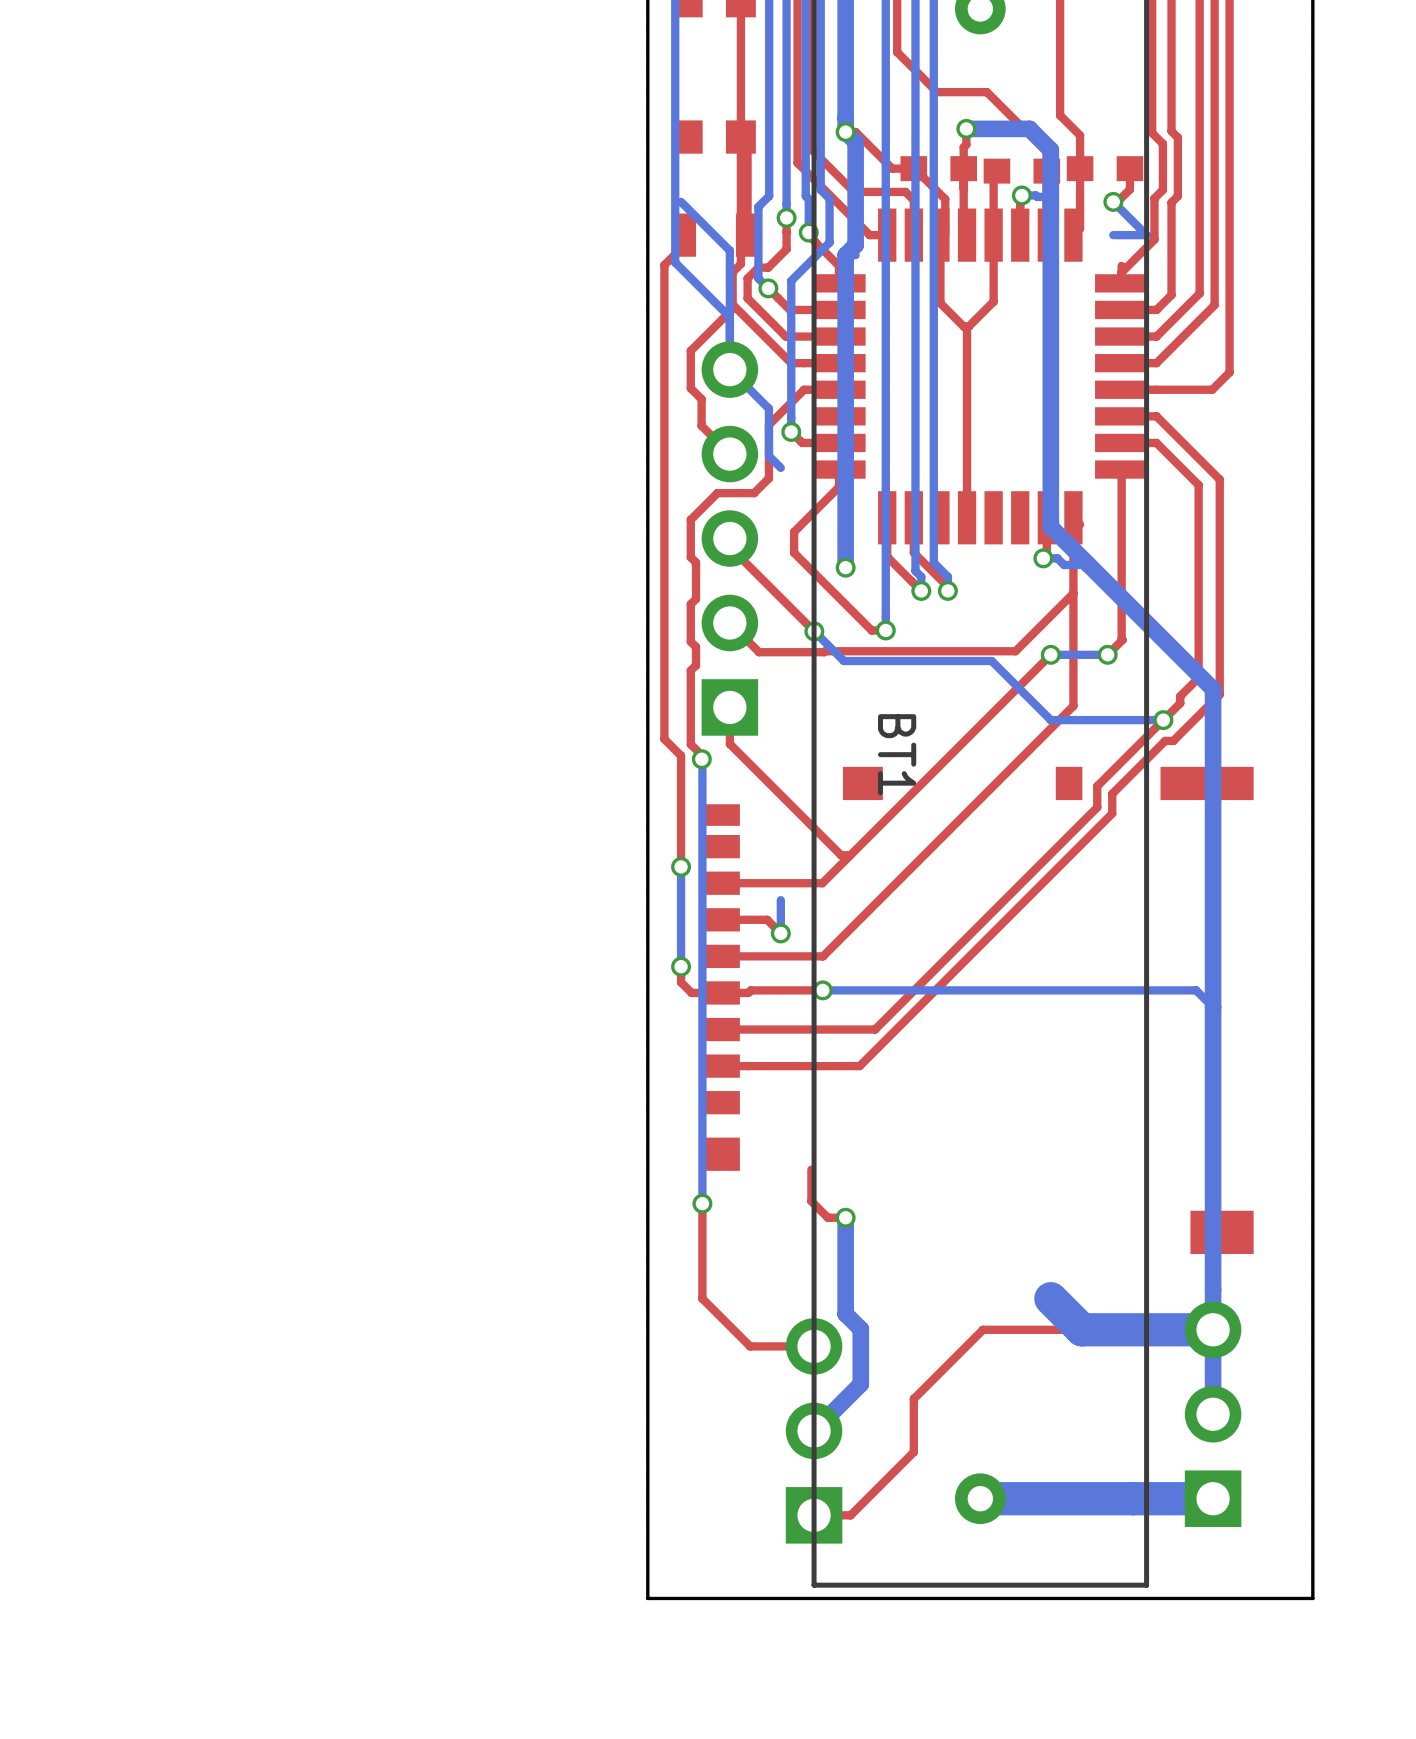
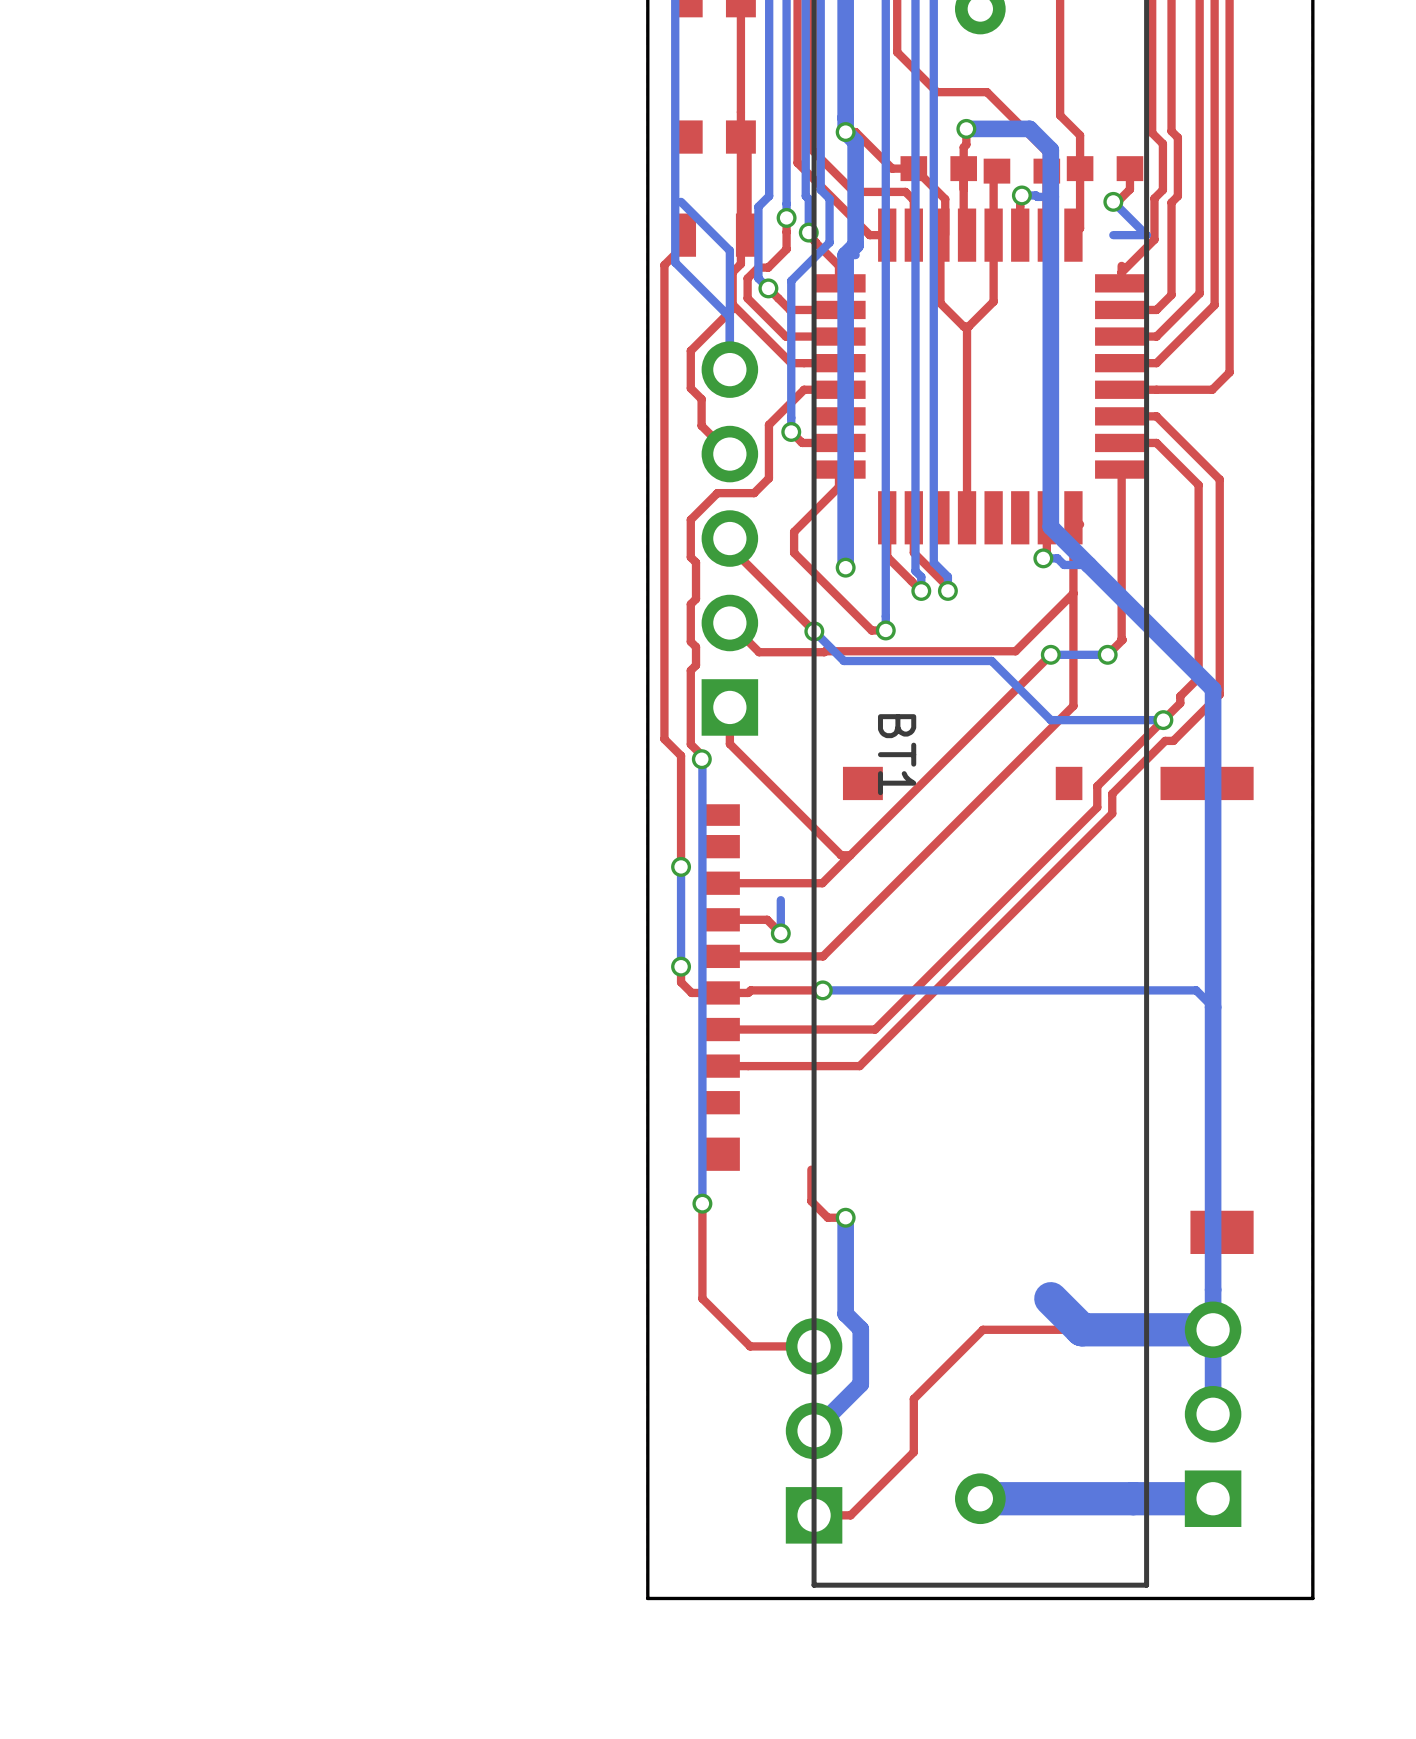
bottom track: (729, 369) (768, 408) (768, 456) (780, 467) -> none

